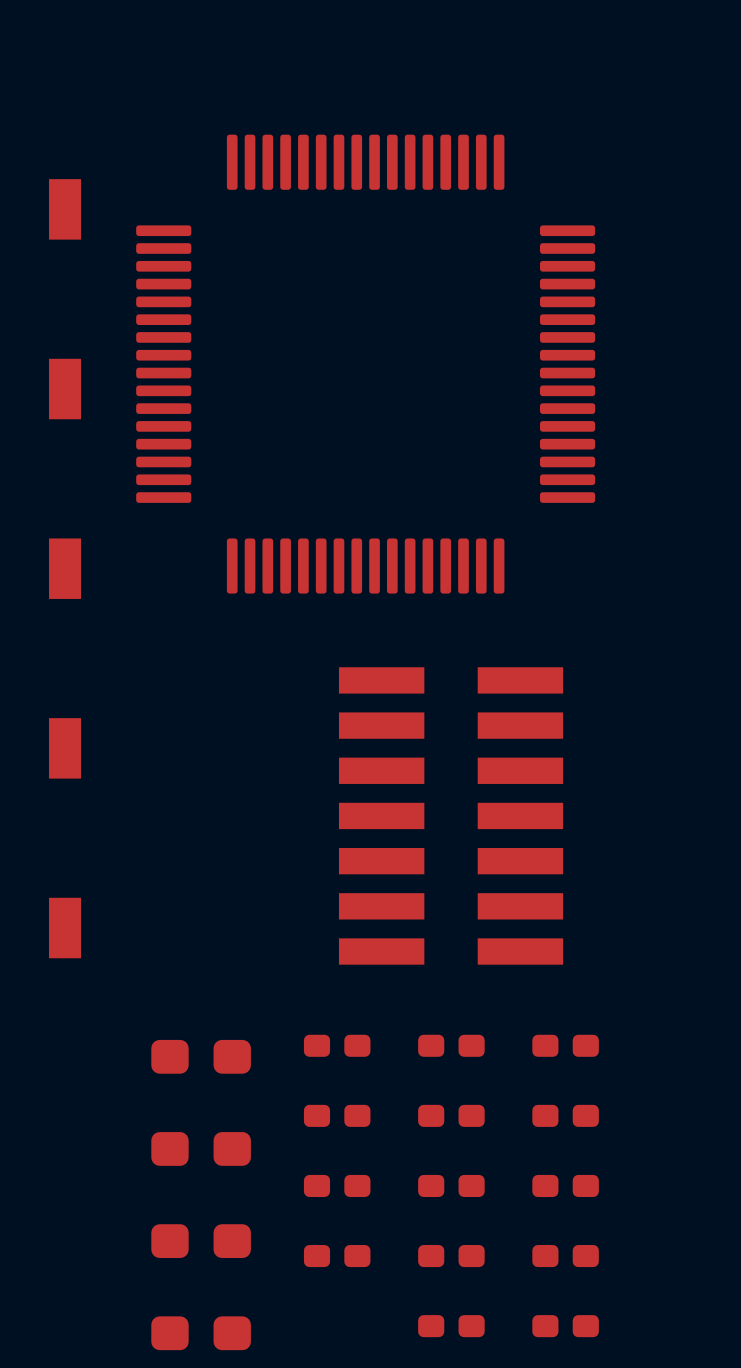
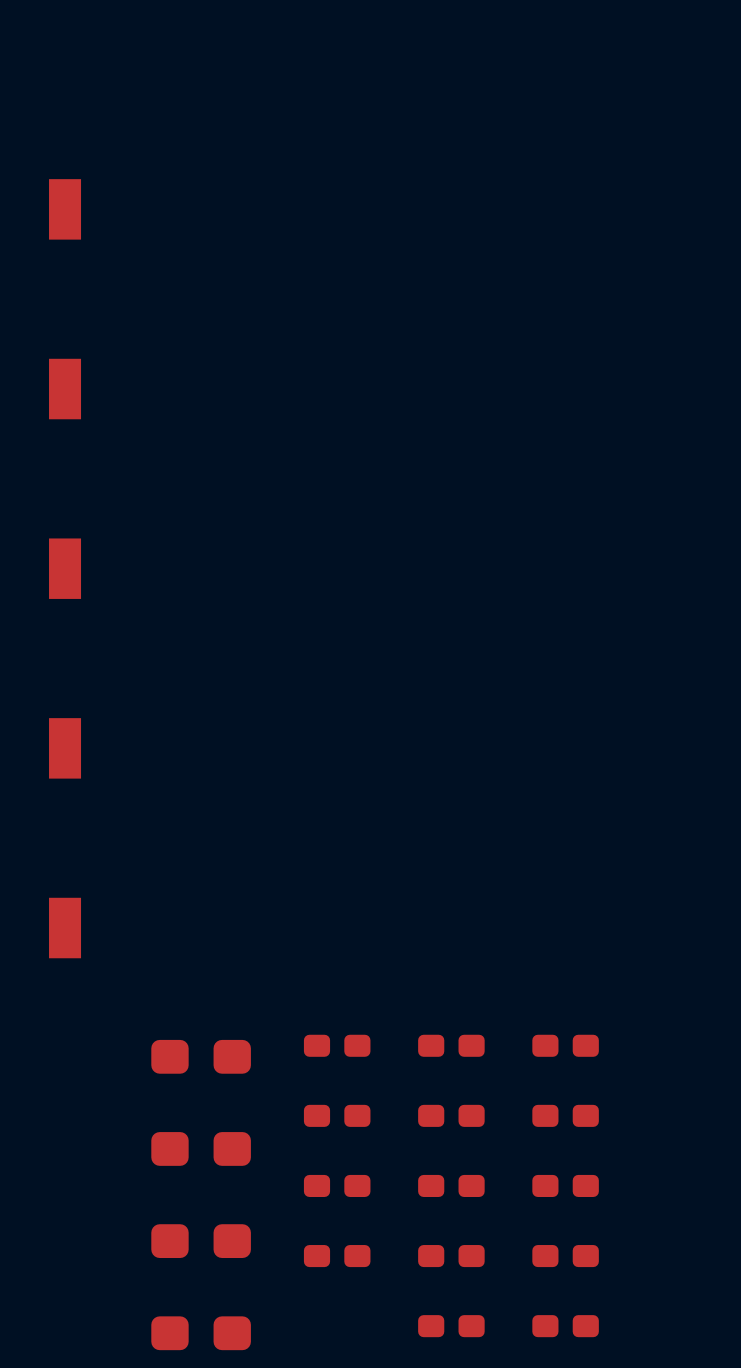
part: (365, 364) -> none
part: (451, 815) -> none

